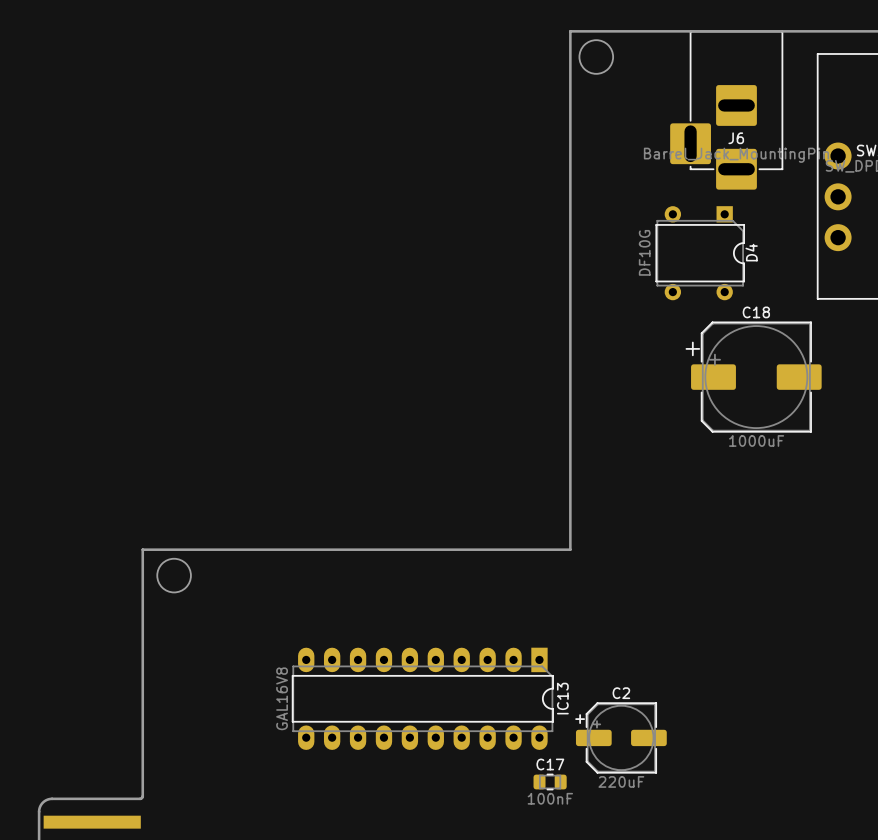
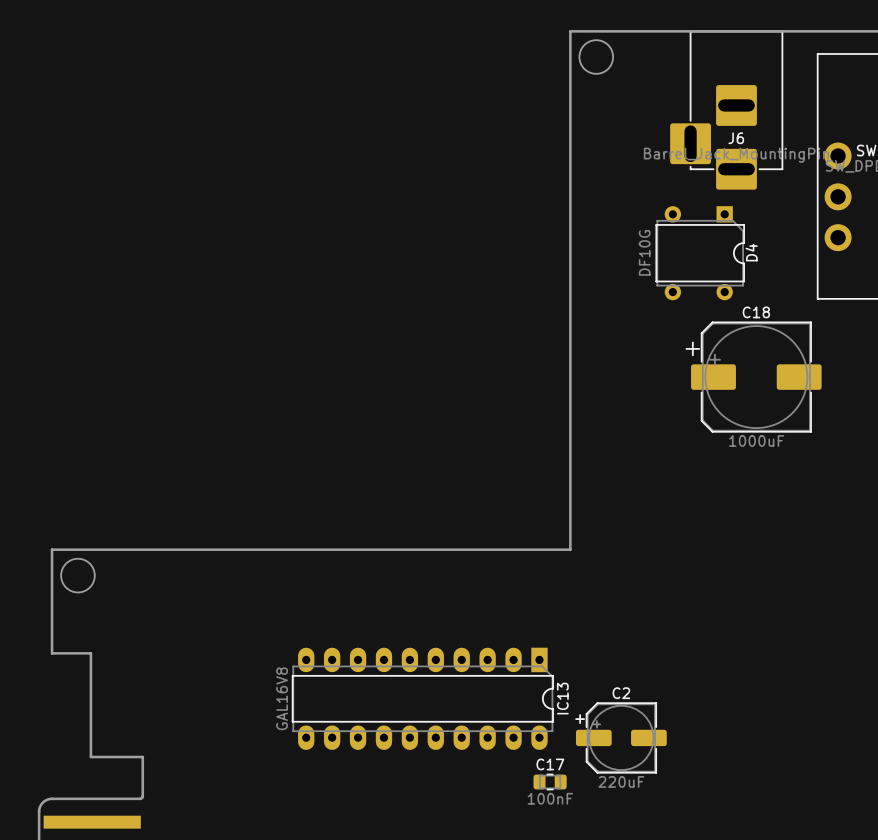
board edge: (142, 549) (142, 757) -> (142, 549) (52, 549) (52, 653) (90, 653) (90, 757) (142, 757)
round board edge position: (174, 575) -> (77, 575)

